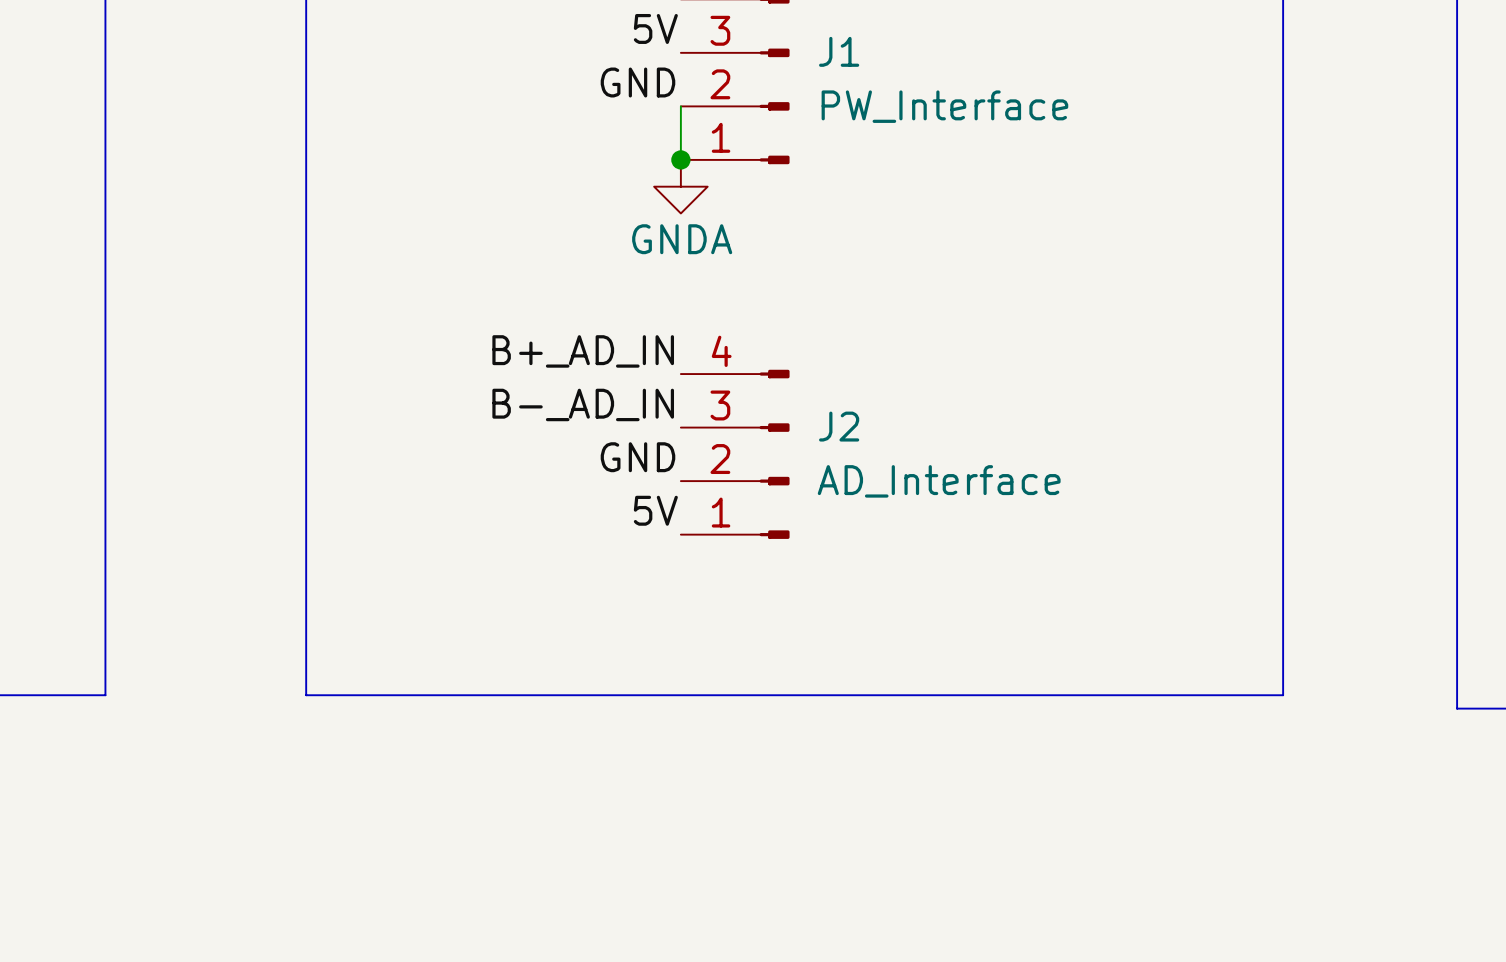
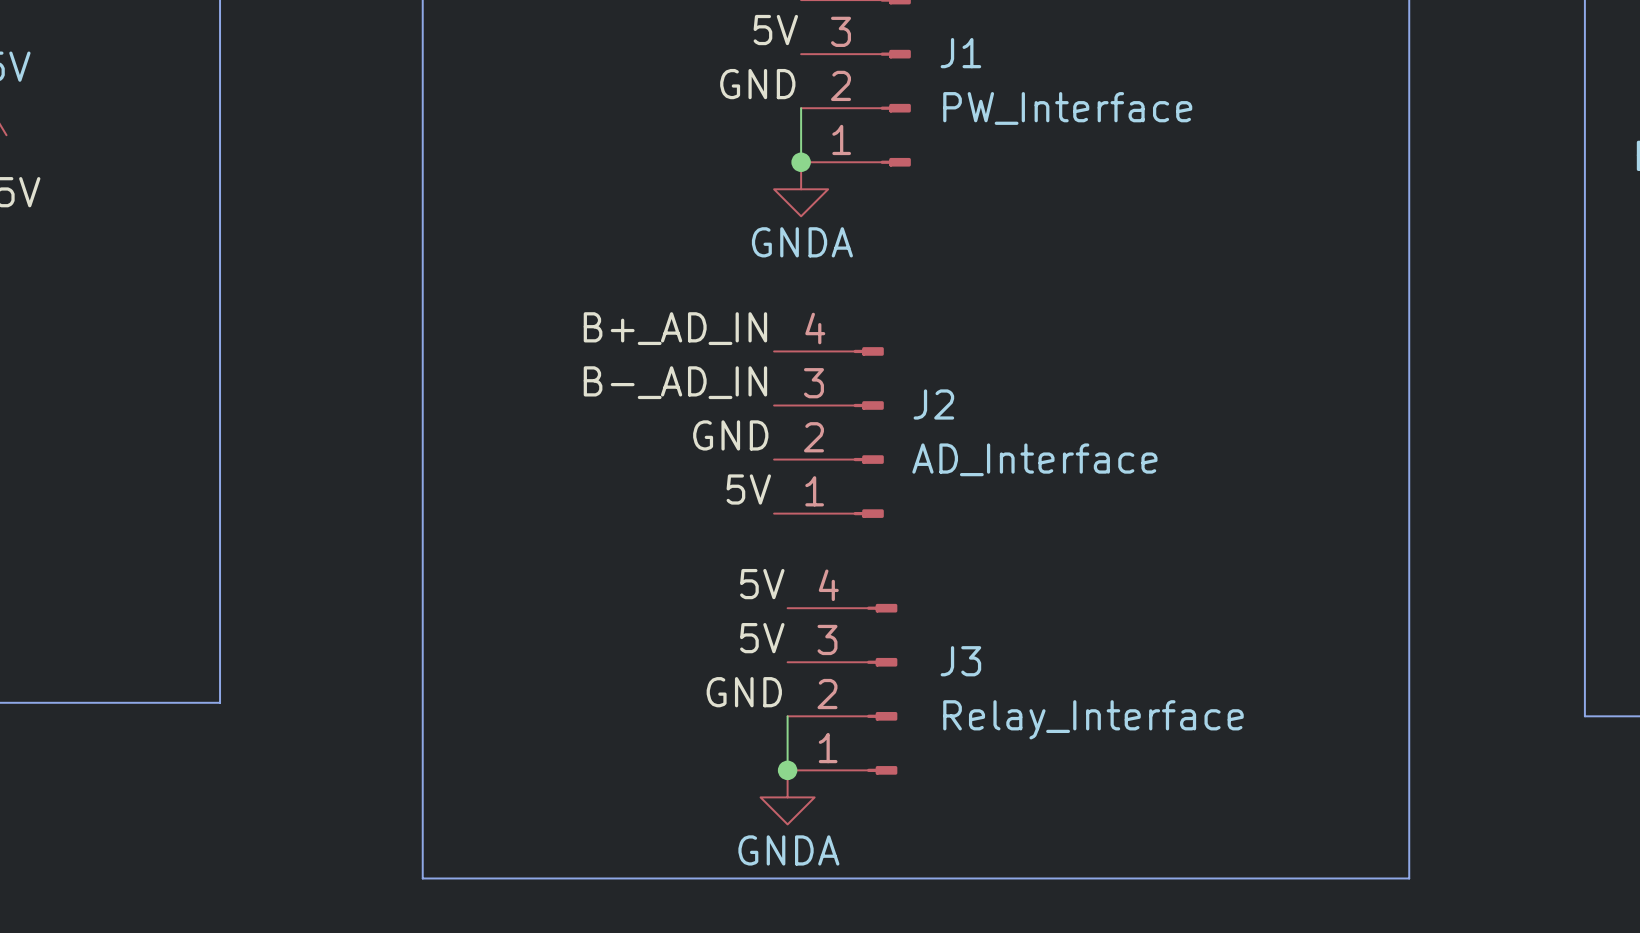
label position: B+_AD_IN (583, 351) -> B+_AD_IN (675, 328)
label position: B-_AD_IN (583, 404) -> B-_AD_IN (675, 382)
J2 position: (735, 454) -> (828, 432)
label position: GND (637, 457) -> GND (730, 435)
label position: 5V (655, 510) -> 5V (748, 489)
label: none -> 5V (762, 584)
label: none -> 5V (762, 638)
J3: none -> Relay_Interface (842, 689)
label: none -> GND (744, 692)
line: (306, 695) (1283, 695) -> (422, 702) (422, 878) (1409, 878) (1409, 702)
wire: none -> (787, 716) (787, 770)
junction: none -> (787, 770)
power symbol: none -> GNDA (787, 797)

